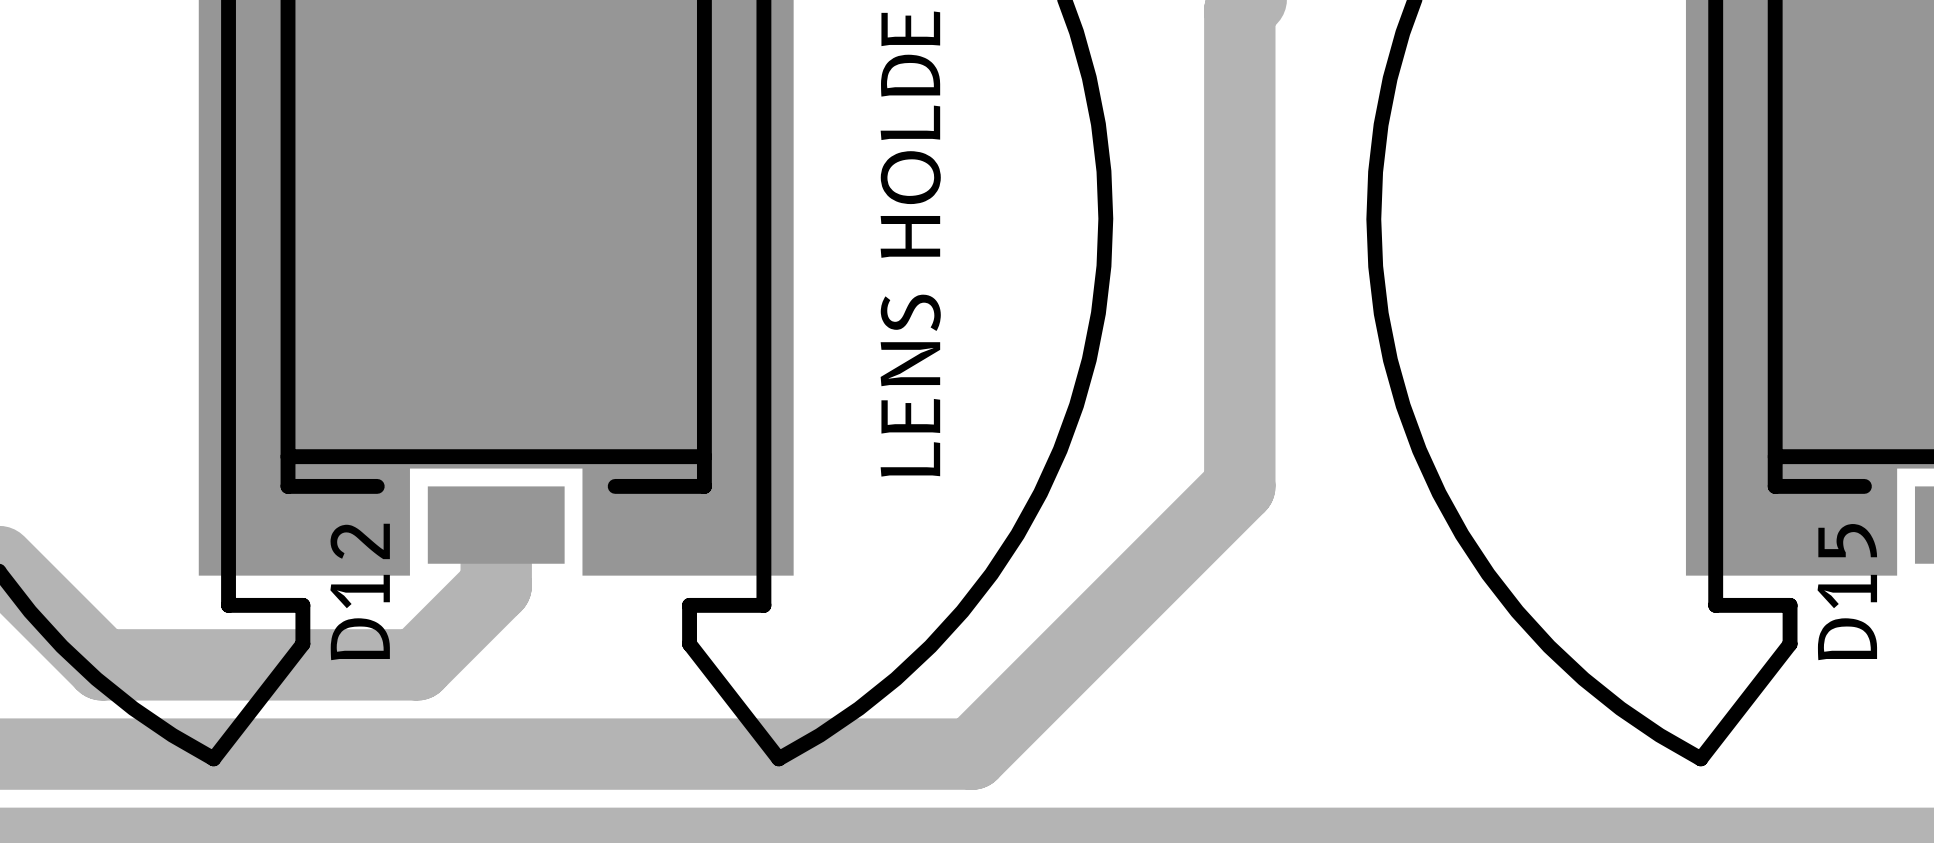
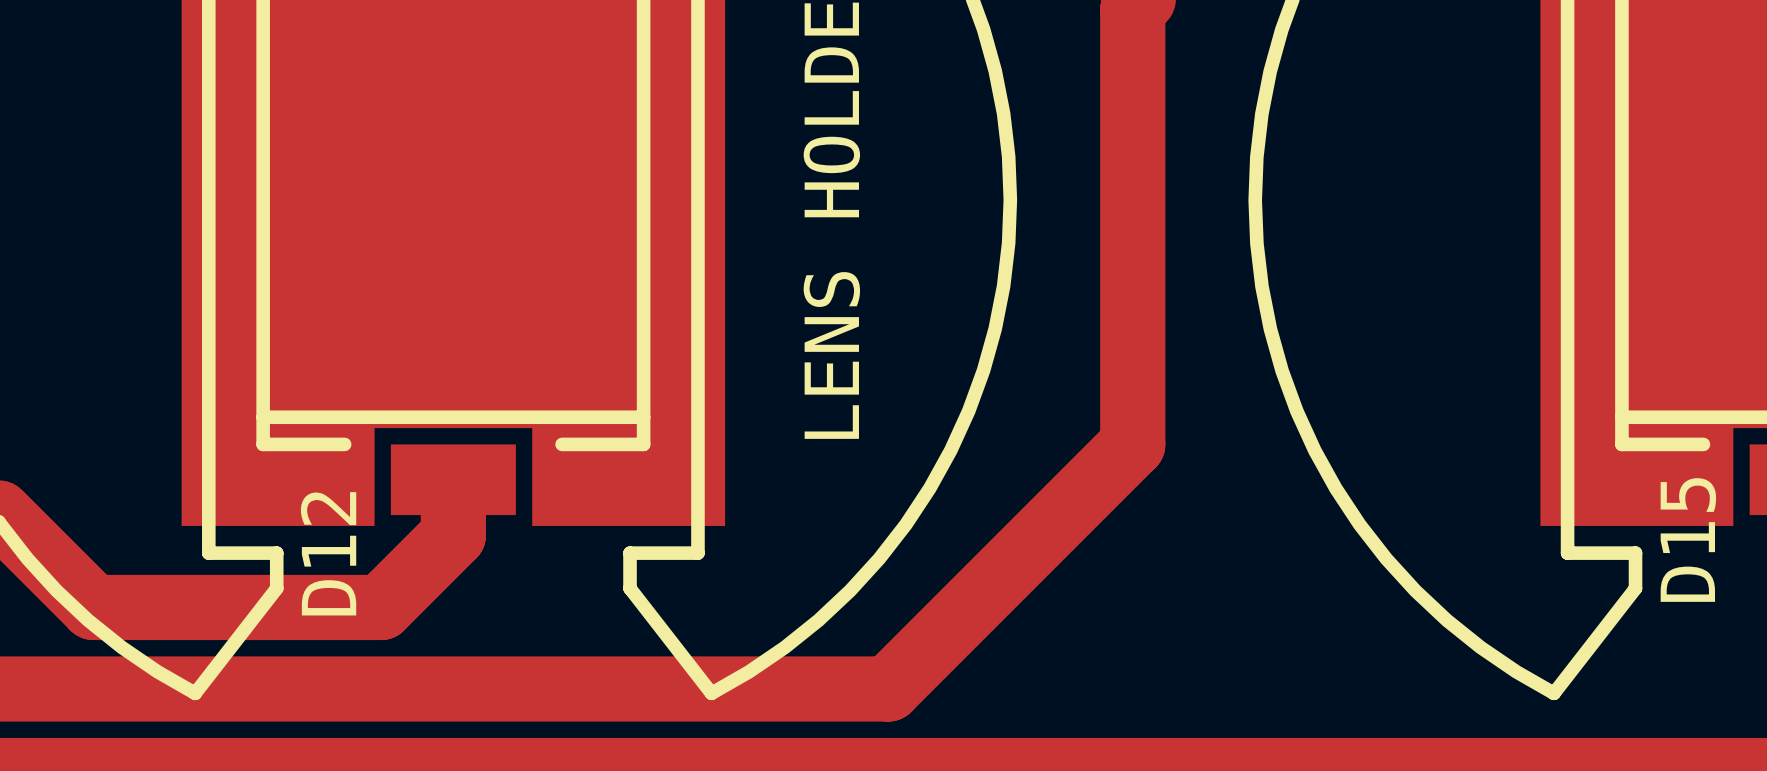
D12 name position: D12 (360, 591) -> D12 (328, 553)

